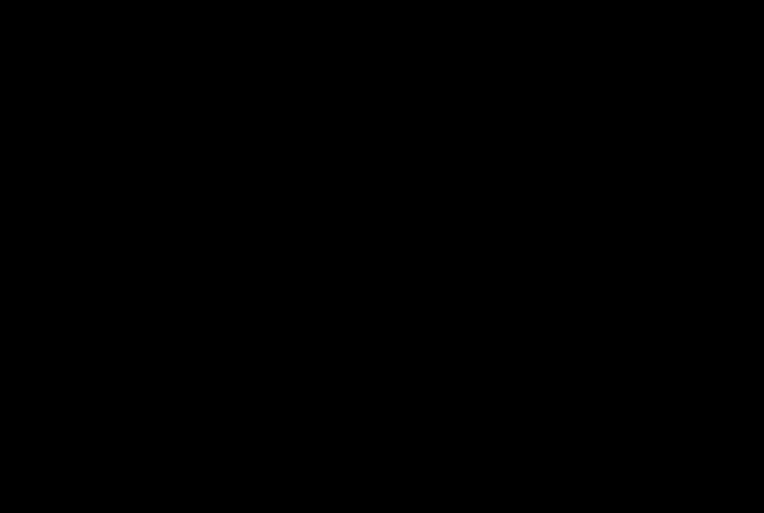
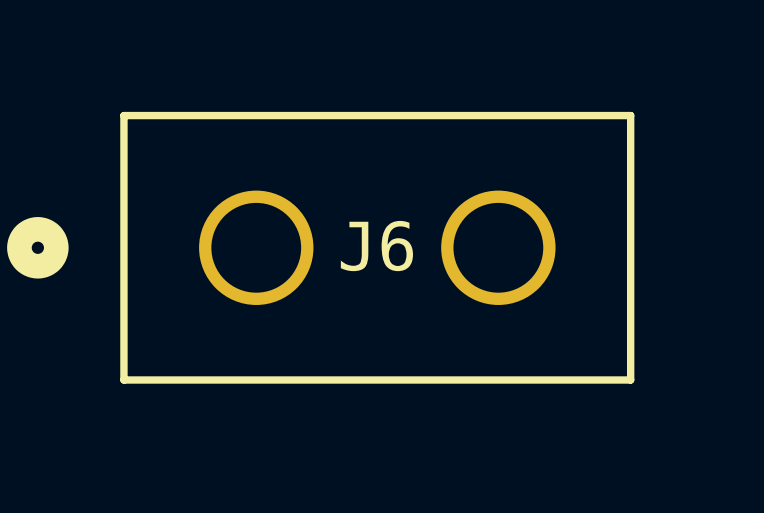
J6: none -> (320, 247)

